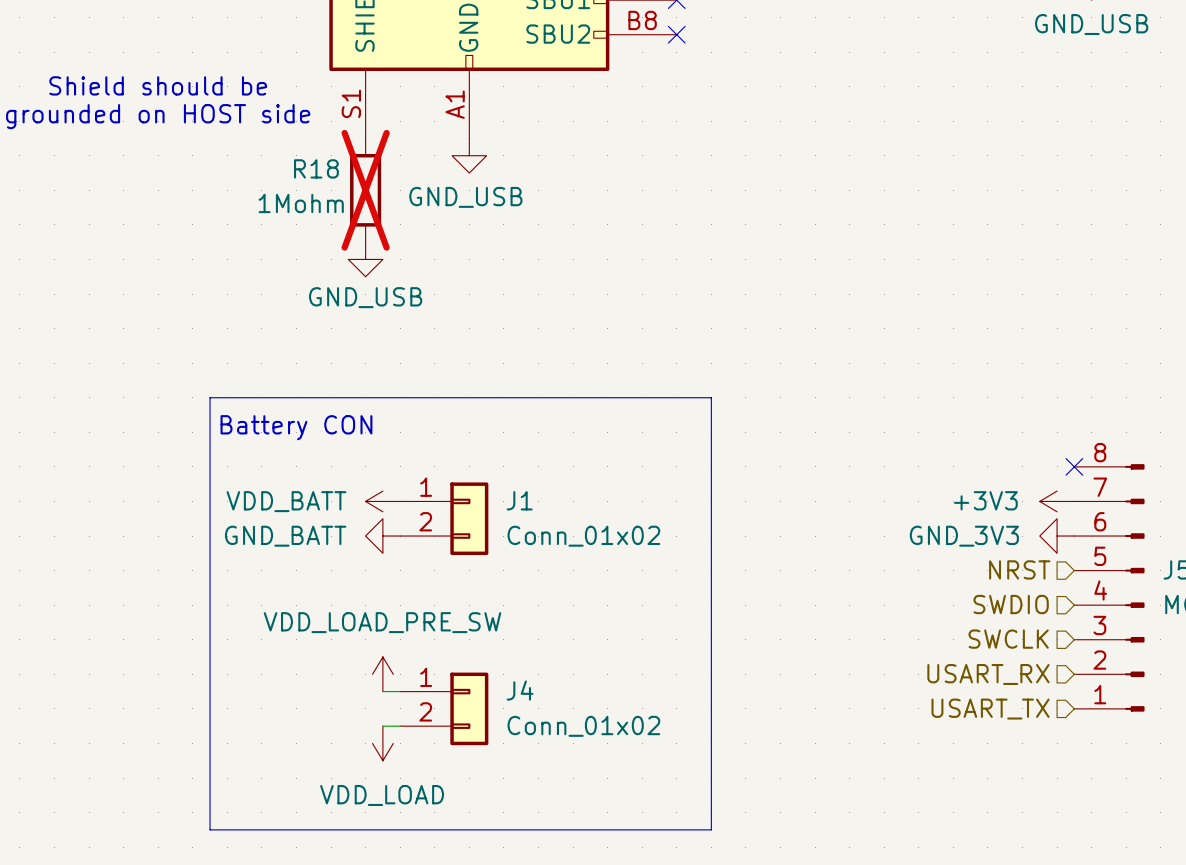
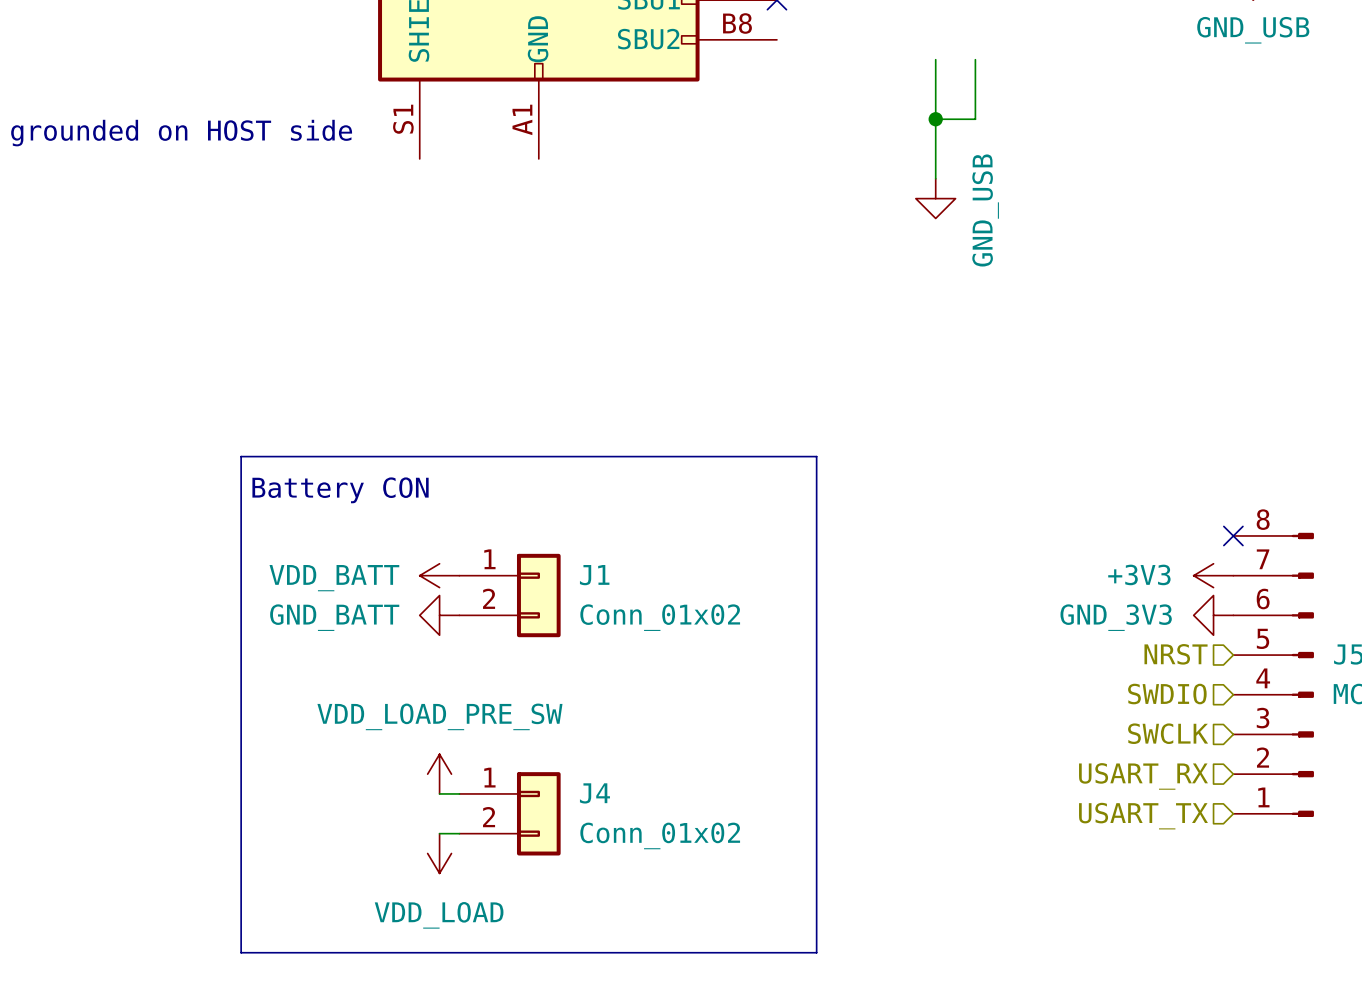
no-connect mark: (676, 34) -> none
wire: none -> (935, 59) (935, 178)
wire: none -> (975, 59) (975, 119) (935, 119)
text: Shield should be (158, 85) -> none
junction: none -> (935, 119)
power symbol: GND_USB (469, 155) -> none
power symbol: none -> GND_USB (935, 198)
R18: 1Mohm (365, 190) -> none
power symbol: GND_USB (365, 259) -> none

